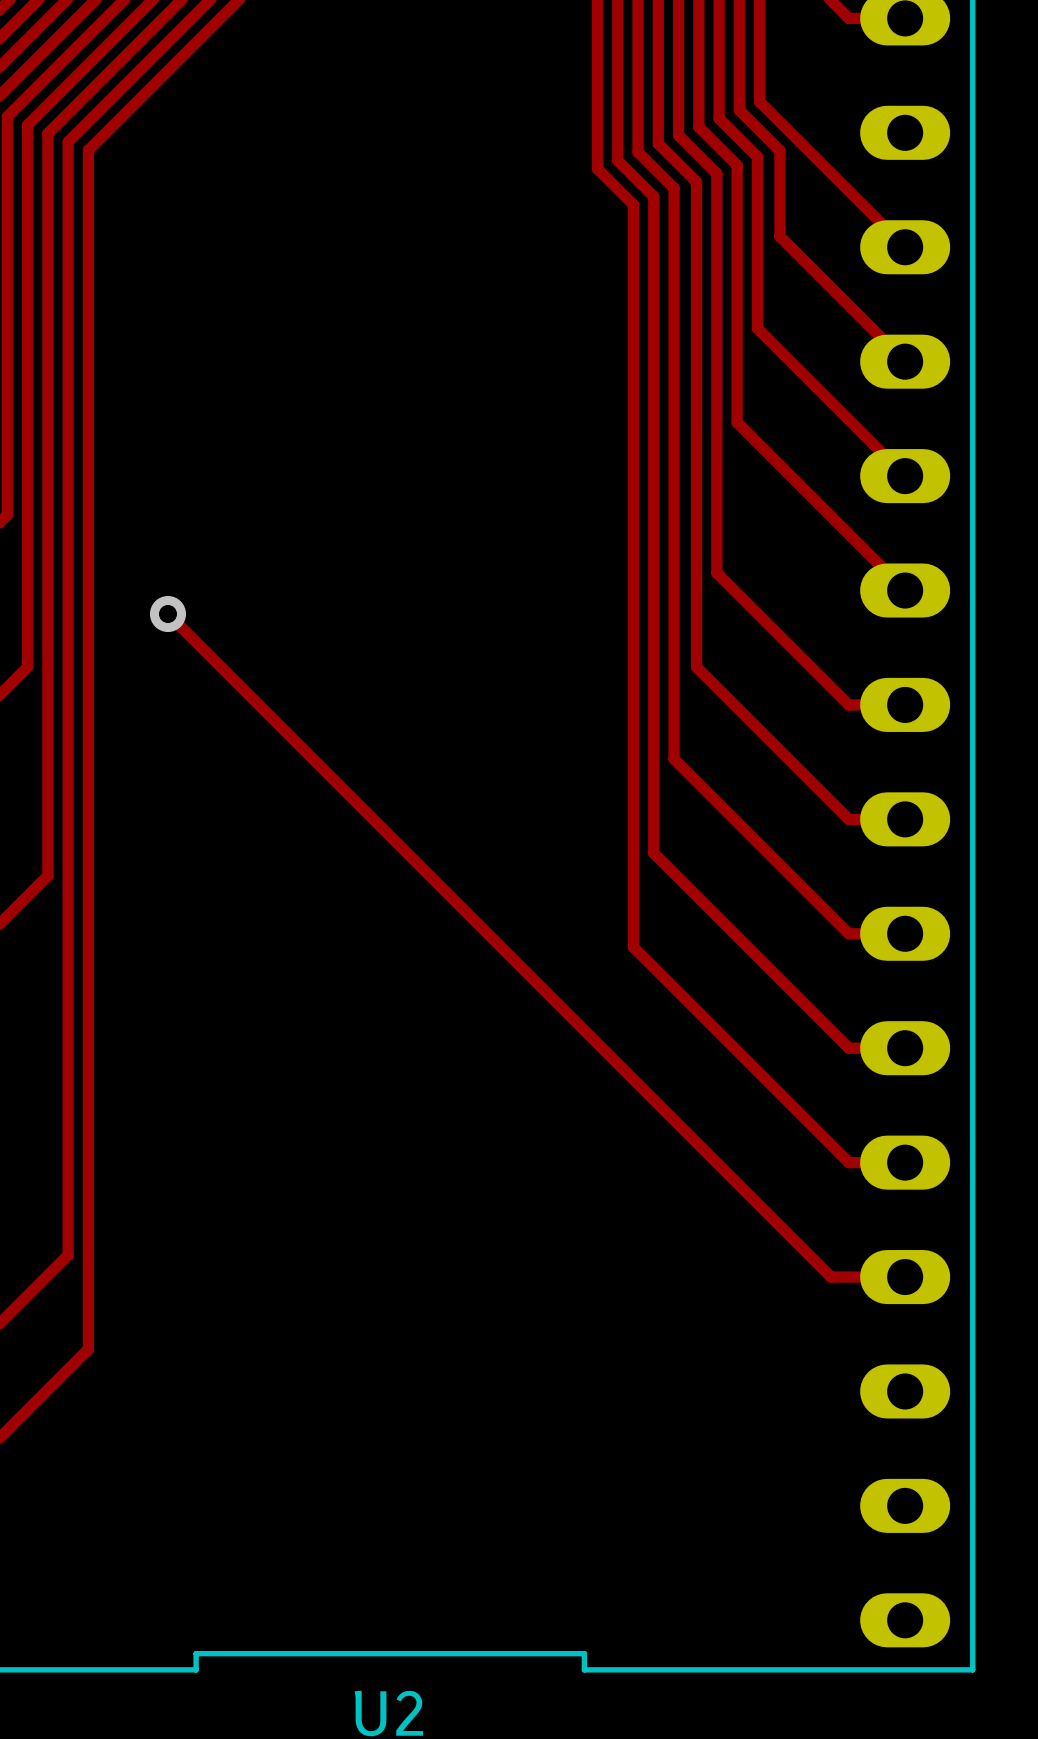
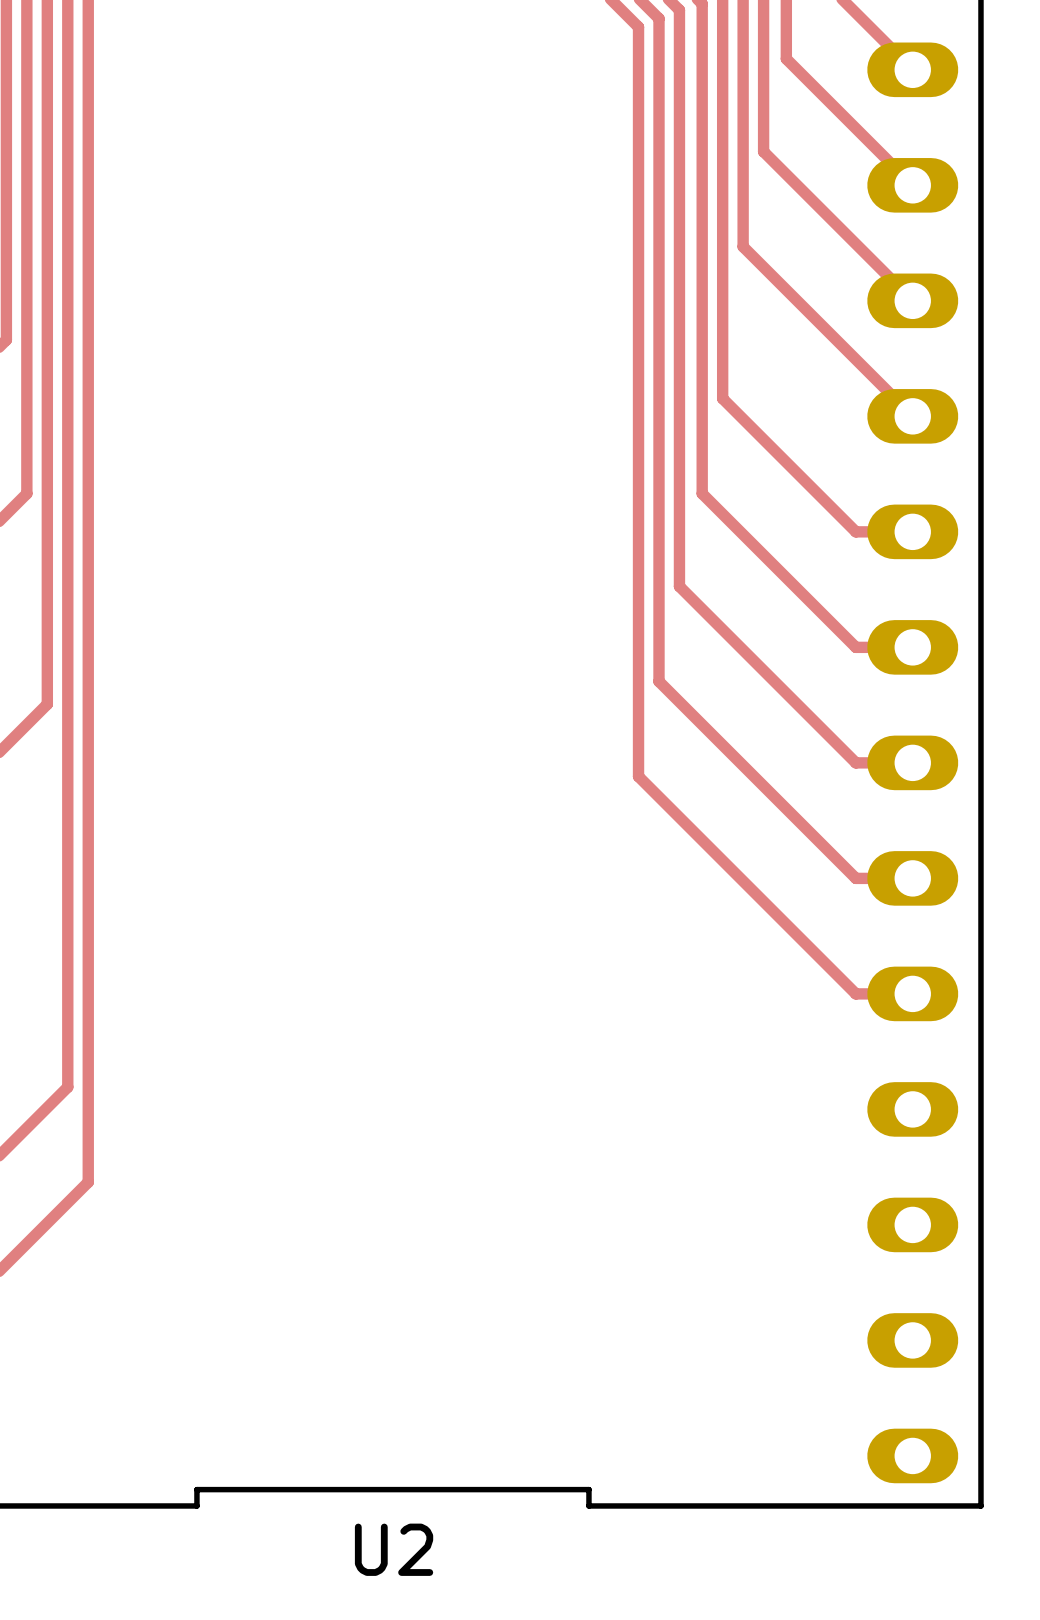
track: (167, 614) (831, 1277) (905, 1277) -> none
via: (167, 614) -> none

